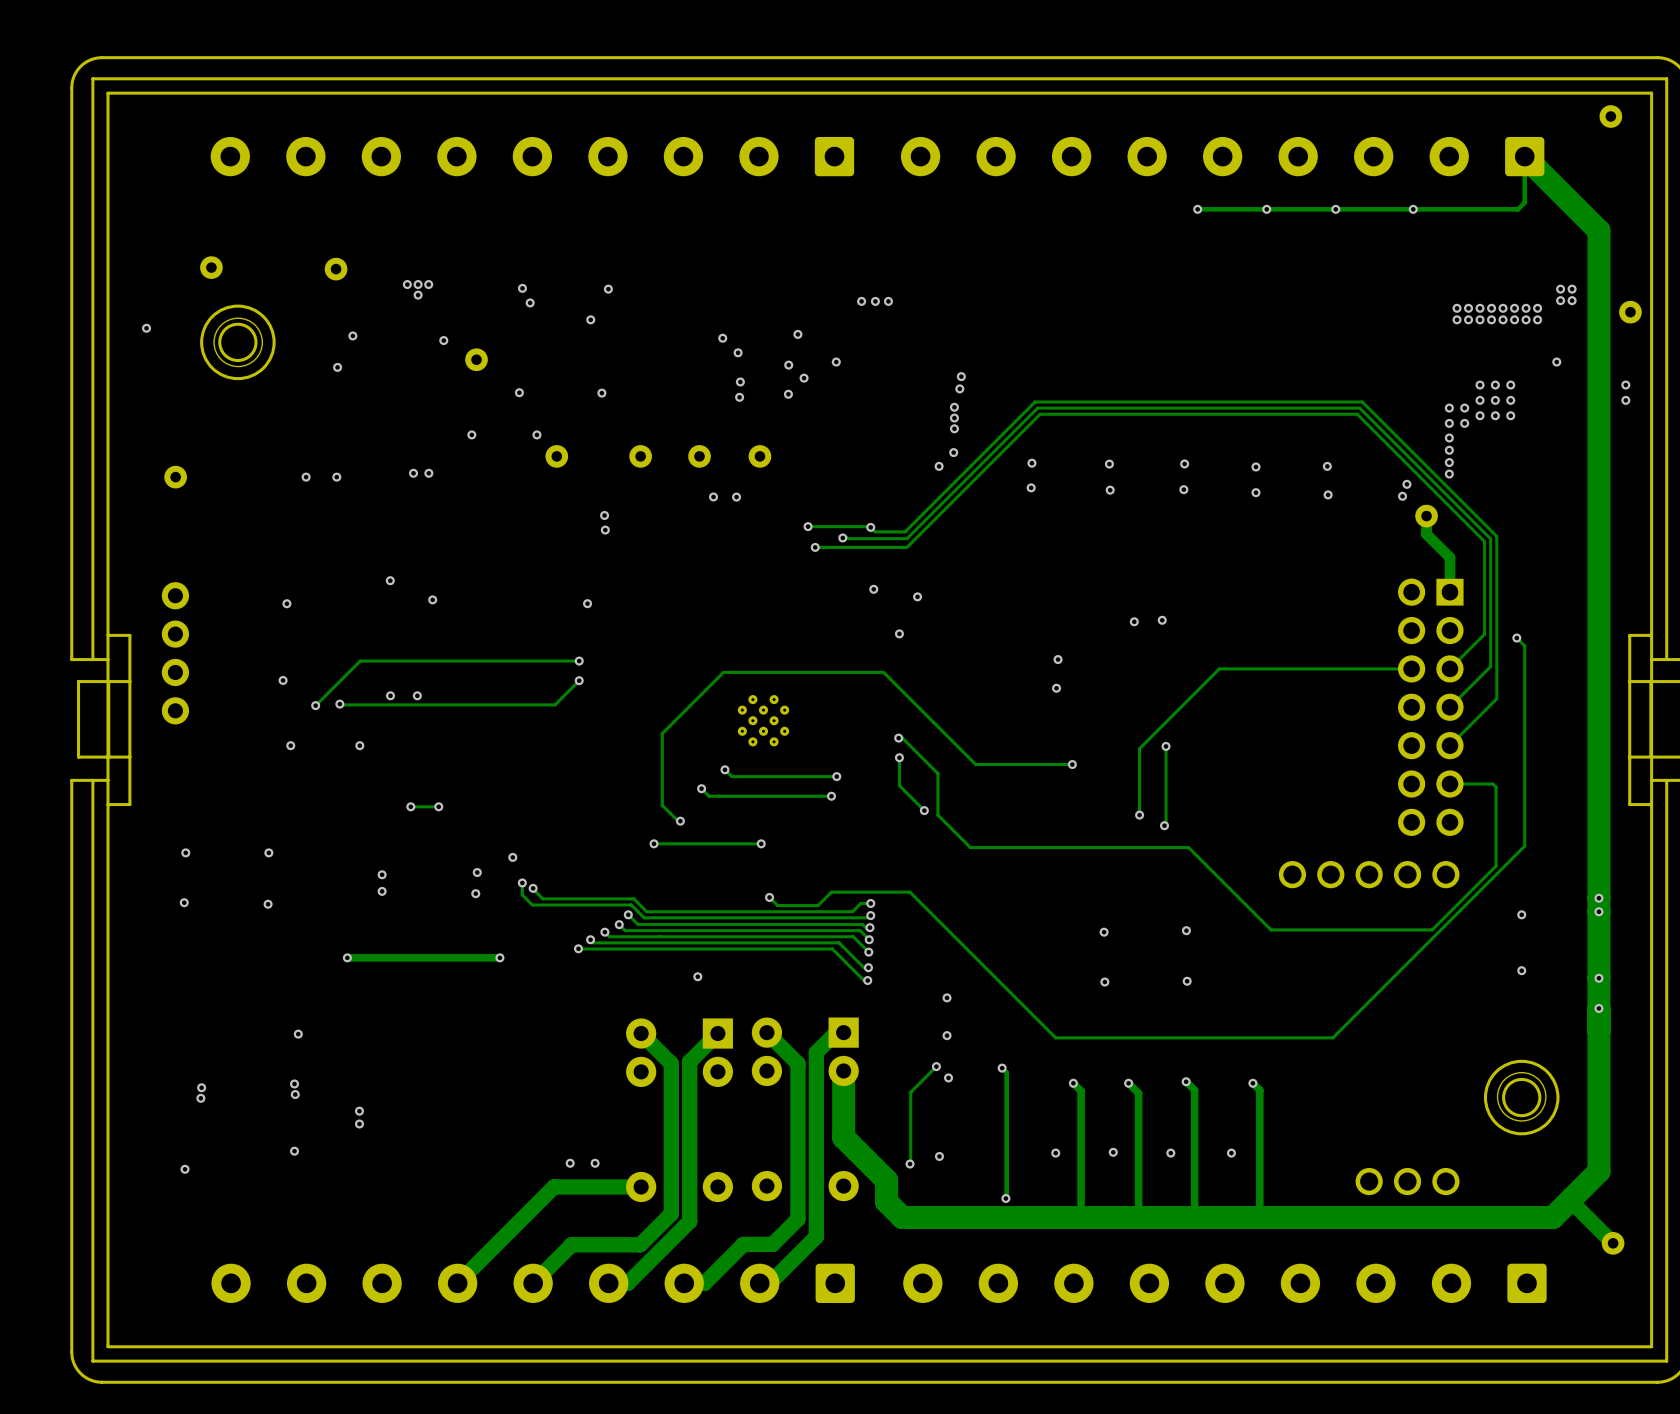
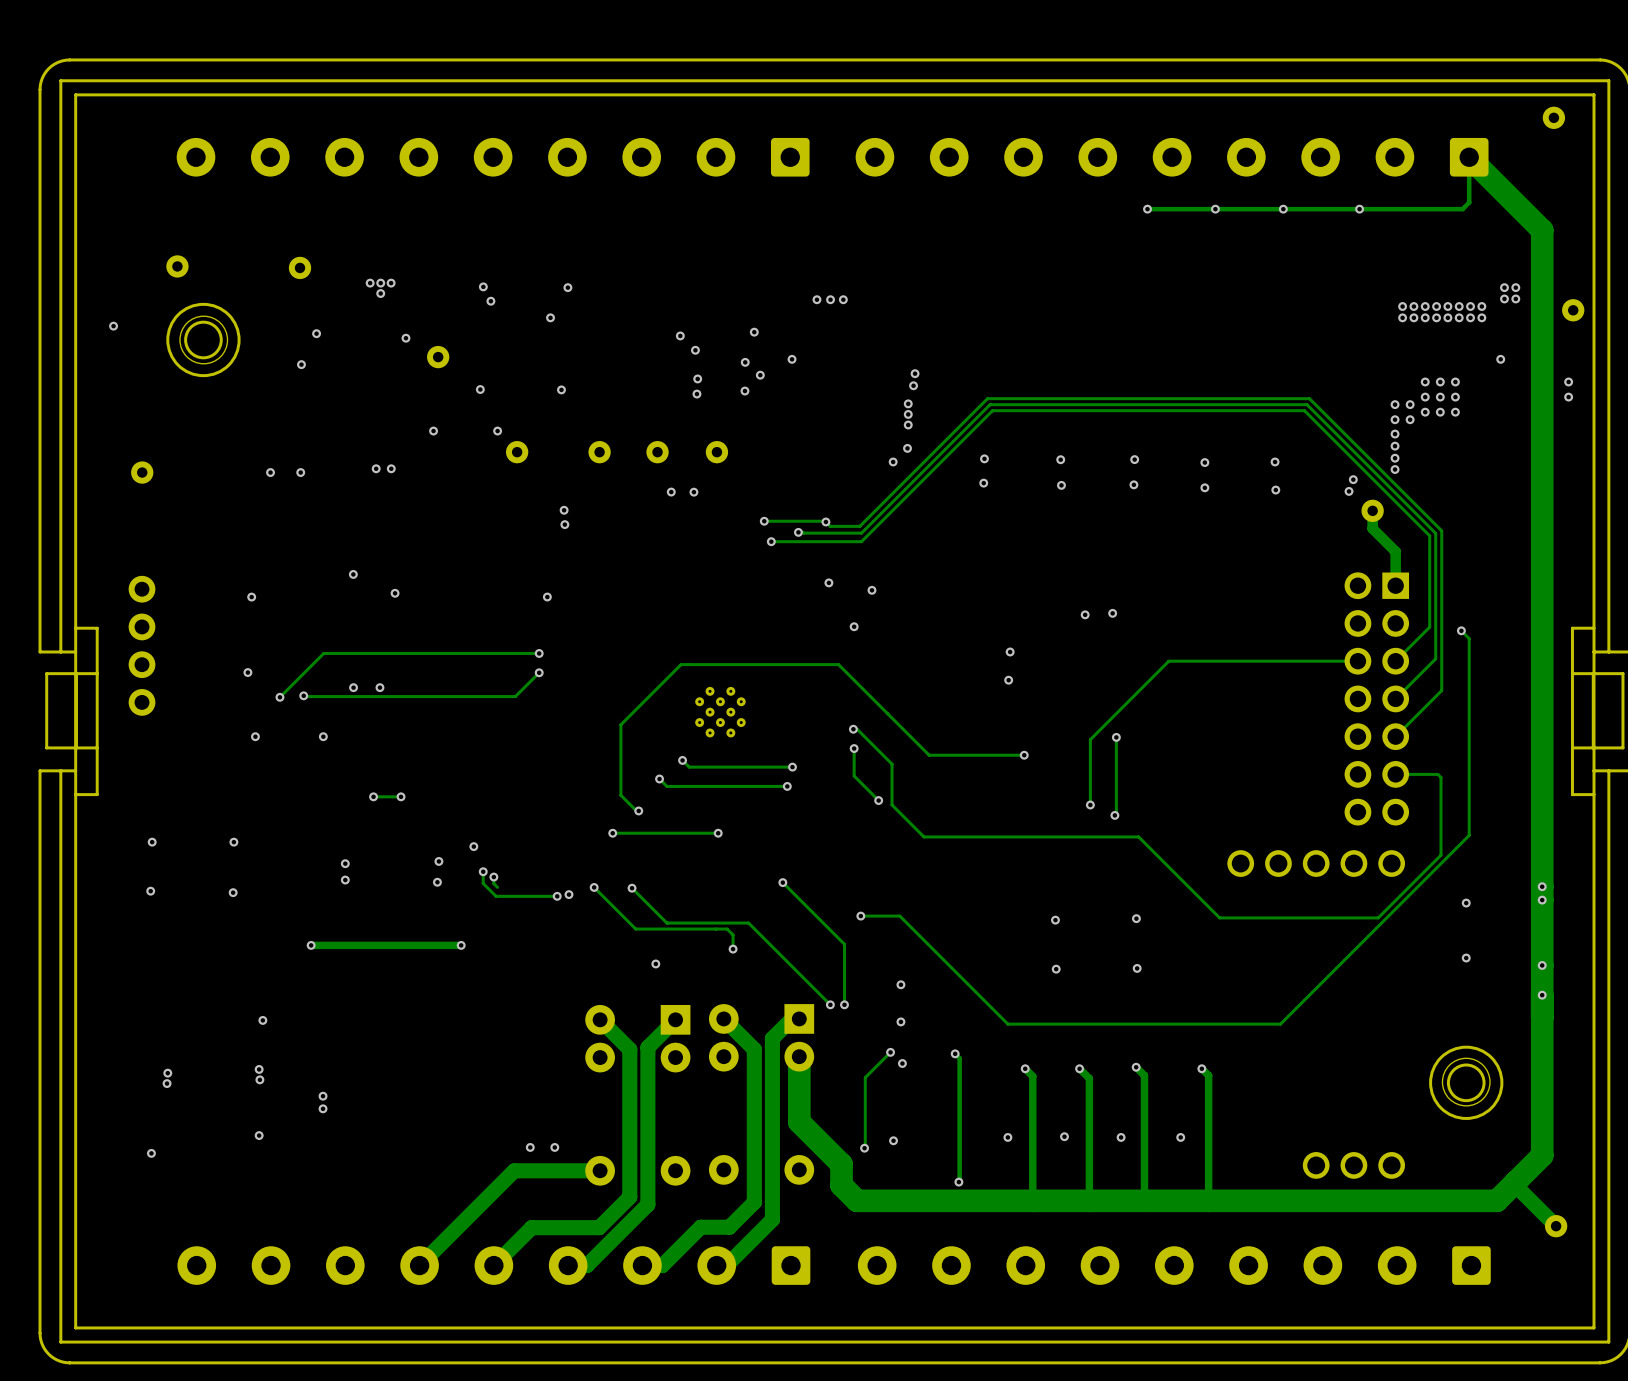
track: (533, 888) (542, 898) (633, 898) (646, 911) (852, 911) (860, 903) (871, 903) -> (493, 877) (493, 883) (497, 887)
track: none -> (782, 882) (844, 944) (844, 1004)
via: none -> (782, 882)
track: (769, 897) (777, 905) (818, 905) (831, 892) (910, 892) (945, 928) -> (860, 916) (899, 916)
via: (769, 897) -> none
track: none -> (594, 887) (635, 929) (727, 929) (733, 935) (733, 949)
via: none -> (594, 887)
track: none -> (632, 888) (666, 923) (748, 923) (830, 1004)
via: none -> (632, 888)
via: (870, 903) -> none
track: (532, 904) (631, 904) (644, 917) (868, 917) (870, 915) -> (493, 893) (496, 896) (557, 896)
via: none -> (568, 894)
via: none -> (557, 896)
track: (628, 914) (638, 924) (862, 924) (867, 928) (869, 927) -> none
via: (628, 914) -> none
via: (870, 915) -> none
track: (619, 924) (625, 930) (860, 930) (869, 939) -> none
via: (619, 924) -> none
via: (869, 927) -> none
via: none -> (860, 916)
track: (604, 932) (609, 936) (853, 936) (868, 952) -> none
via: (604, 932) -> none
track: (590, 939) (593, 942) (839, 942) (863, 967) (868, 967) -> none
via: (590, 939) -> none
via: (869, 939) -> none
track: (578, 948) (832, 948) (863, 980) (867, 980) -> none
via: (578, 948) -> none
via: (868, 952) -> none
via: none -> (733, 949)
via: (868, 967) -> none
via: (867, 980) -> none
via: none -> (830, 1004)
via: none -> (844, 1004)

